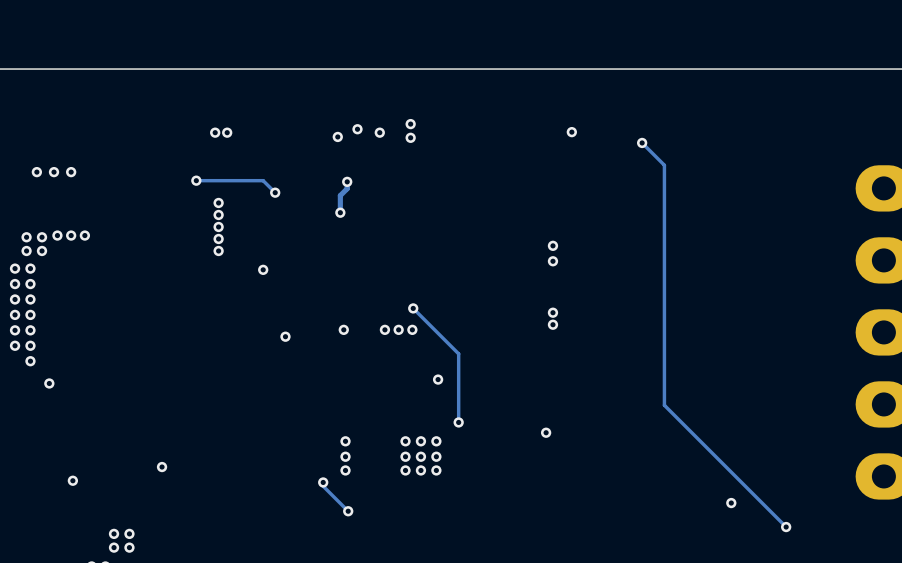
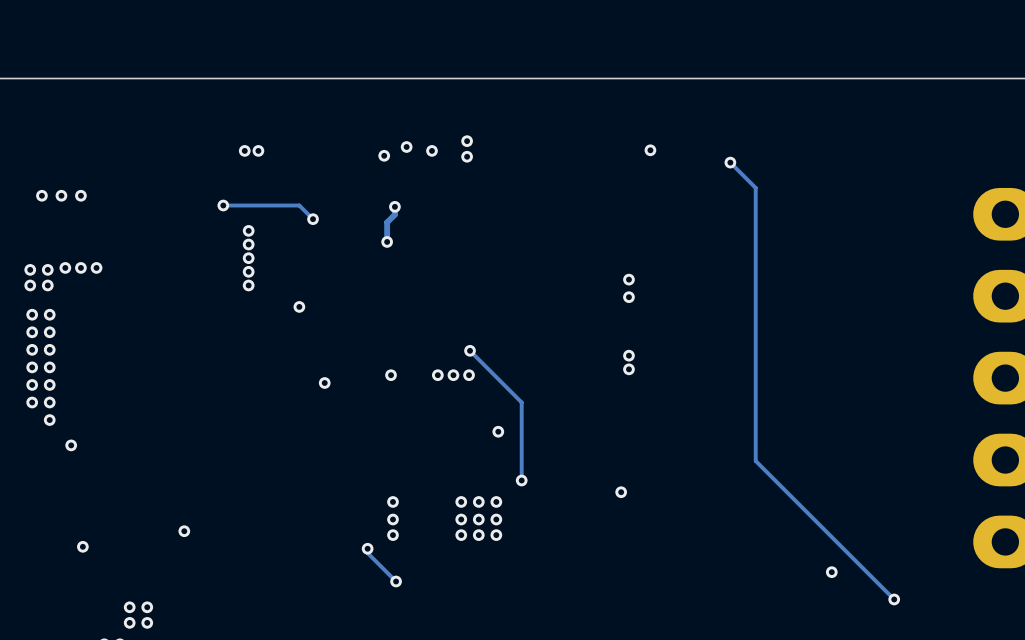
via: (15, 268) -> none
via: (30, 268) -> none
via: none -> (32, 314)
via: none -> (49, 314)
via: (15, 284) -> none
via: (30, 284) -> none
via: none -> (32, 332)
via: none -> (49, 332)
via: (15, 299) -> none
via: (30, 299) -> none
via: none -> (32, 349)
via: none -> (49, 349)
via: (15, 314) -> none
via: (30, 314) -> none
via: none -> (32, 367)
via: none -> (49, 367)
via: (15, 330) -> none
via: (30, 330) -> none
via: none -> (32, 384)
via: none -> (49, 384)
via: (15, 345) -> none
via: (30, 345) -> none
via: none -> (32, 402)
via: none -> (49, 402)
via: (30, 361) -> none
via: none -> (49, 420)
via: (49, 383) -> none
via: none -> (71, 445)

